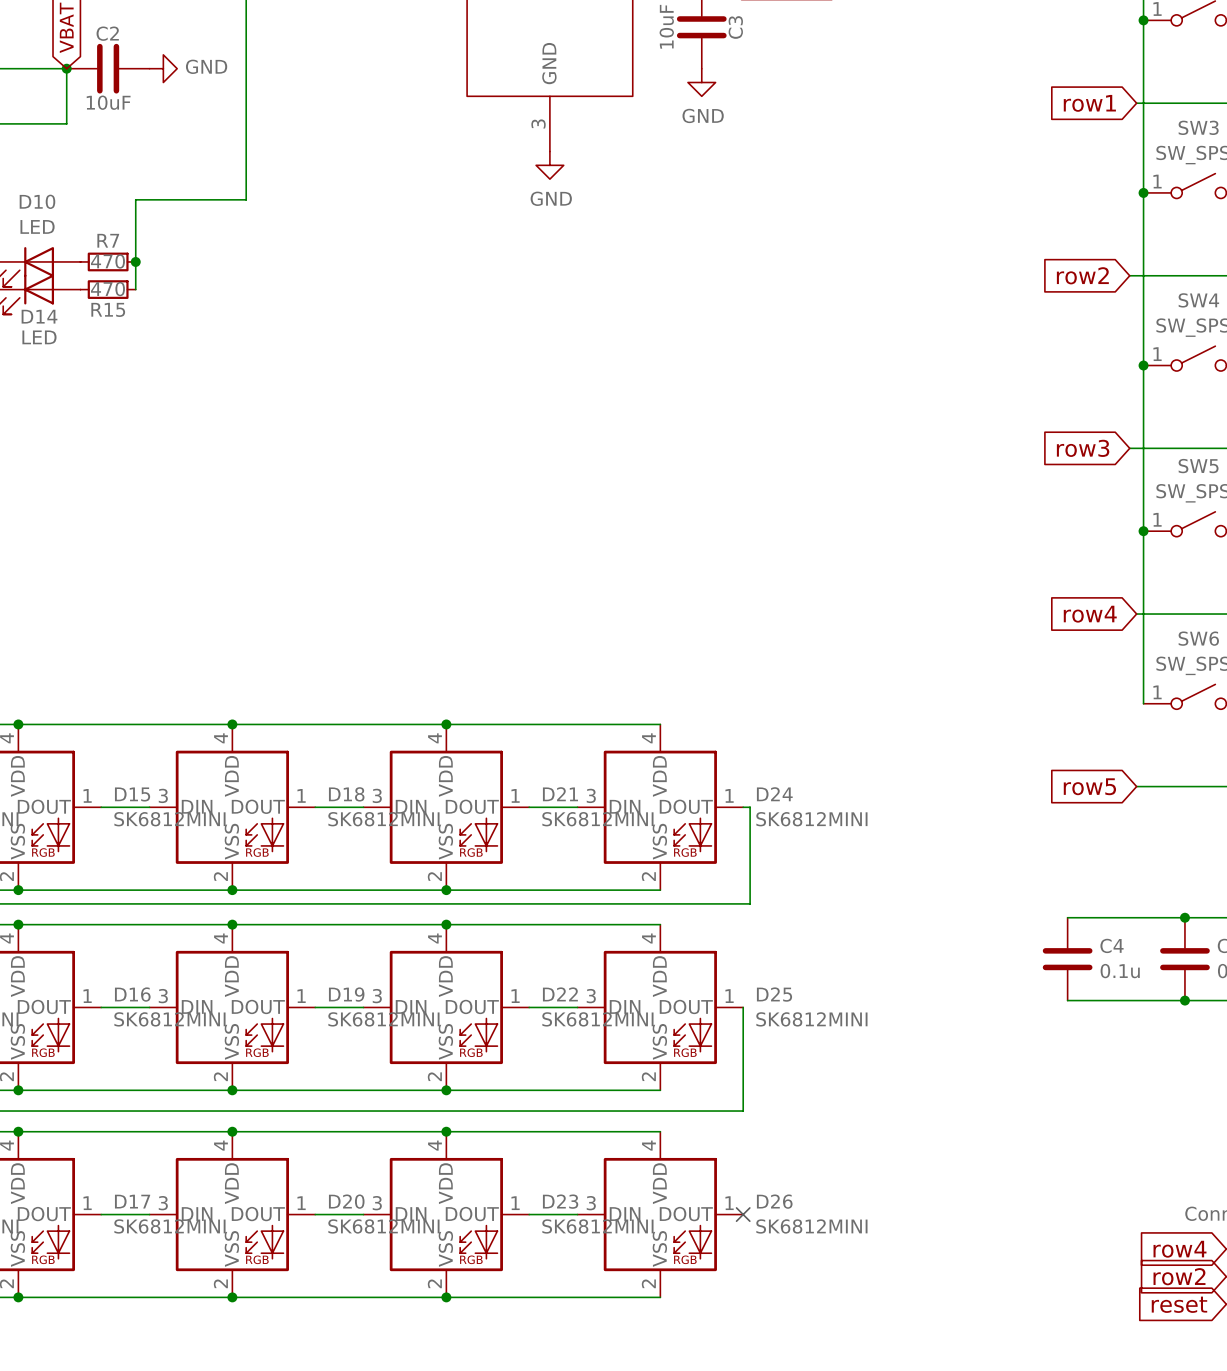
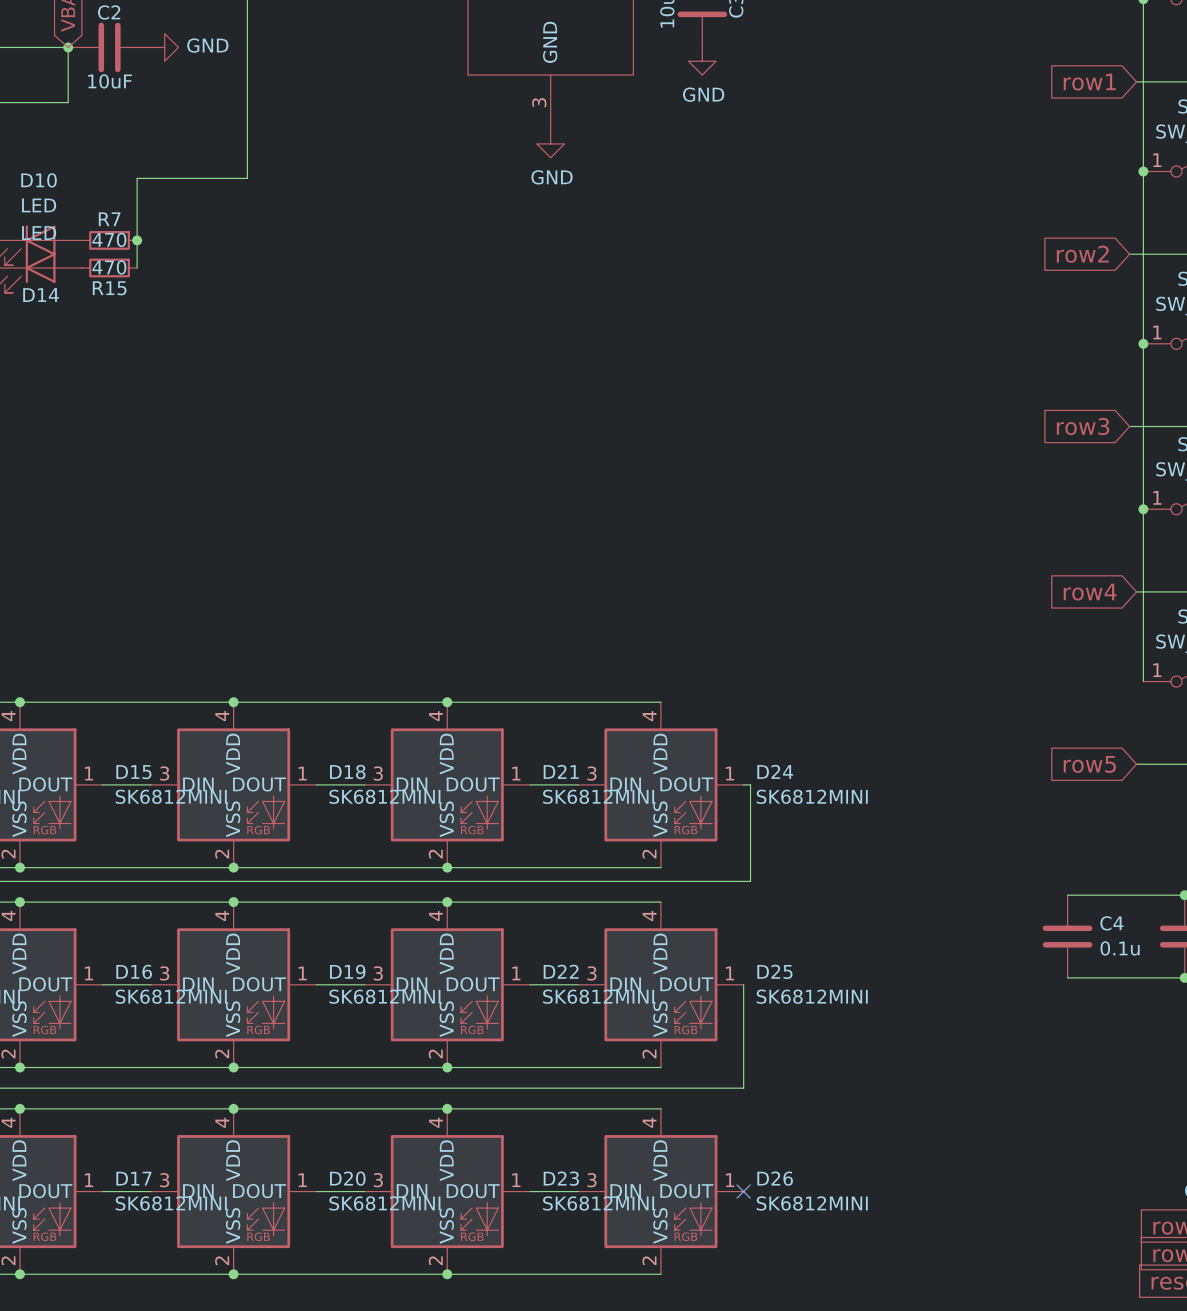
D14 value position: LED (39, 337) -> LED (39, 233)

